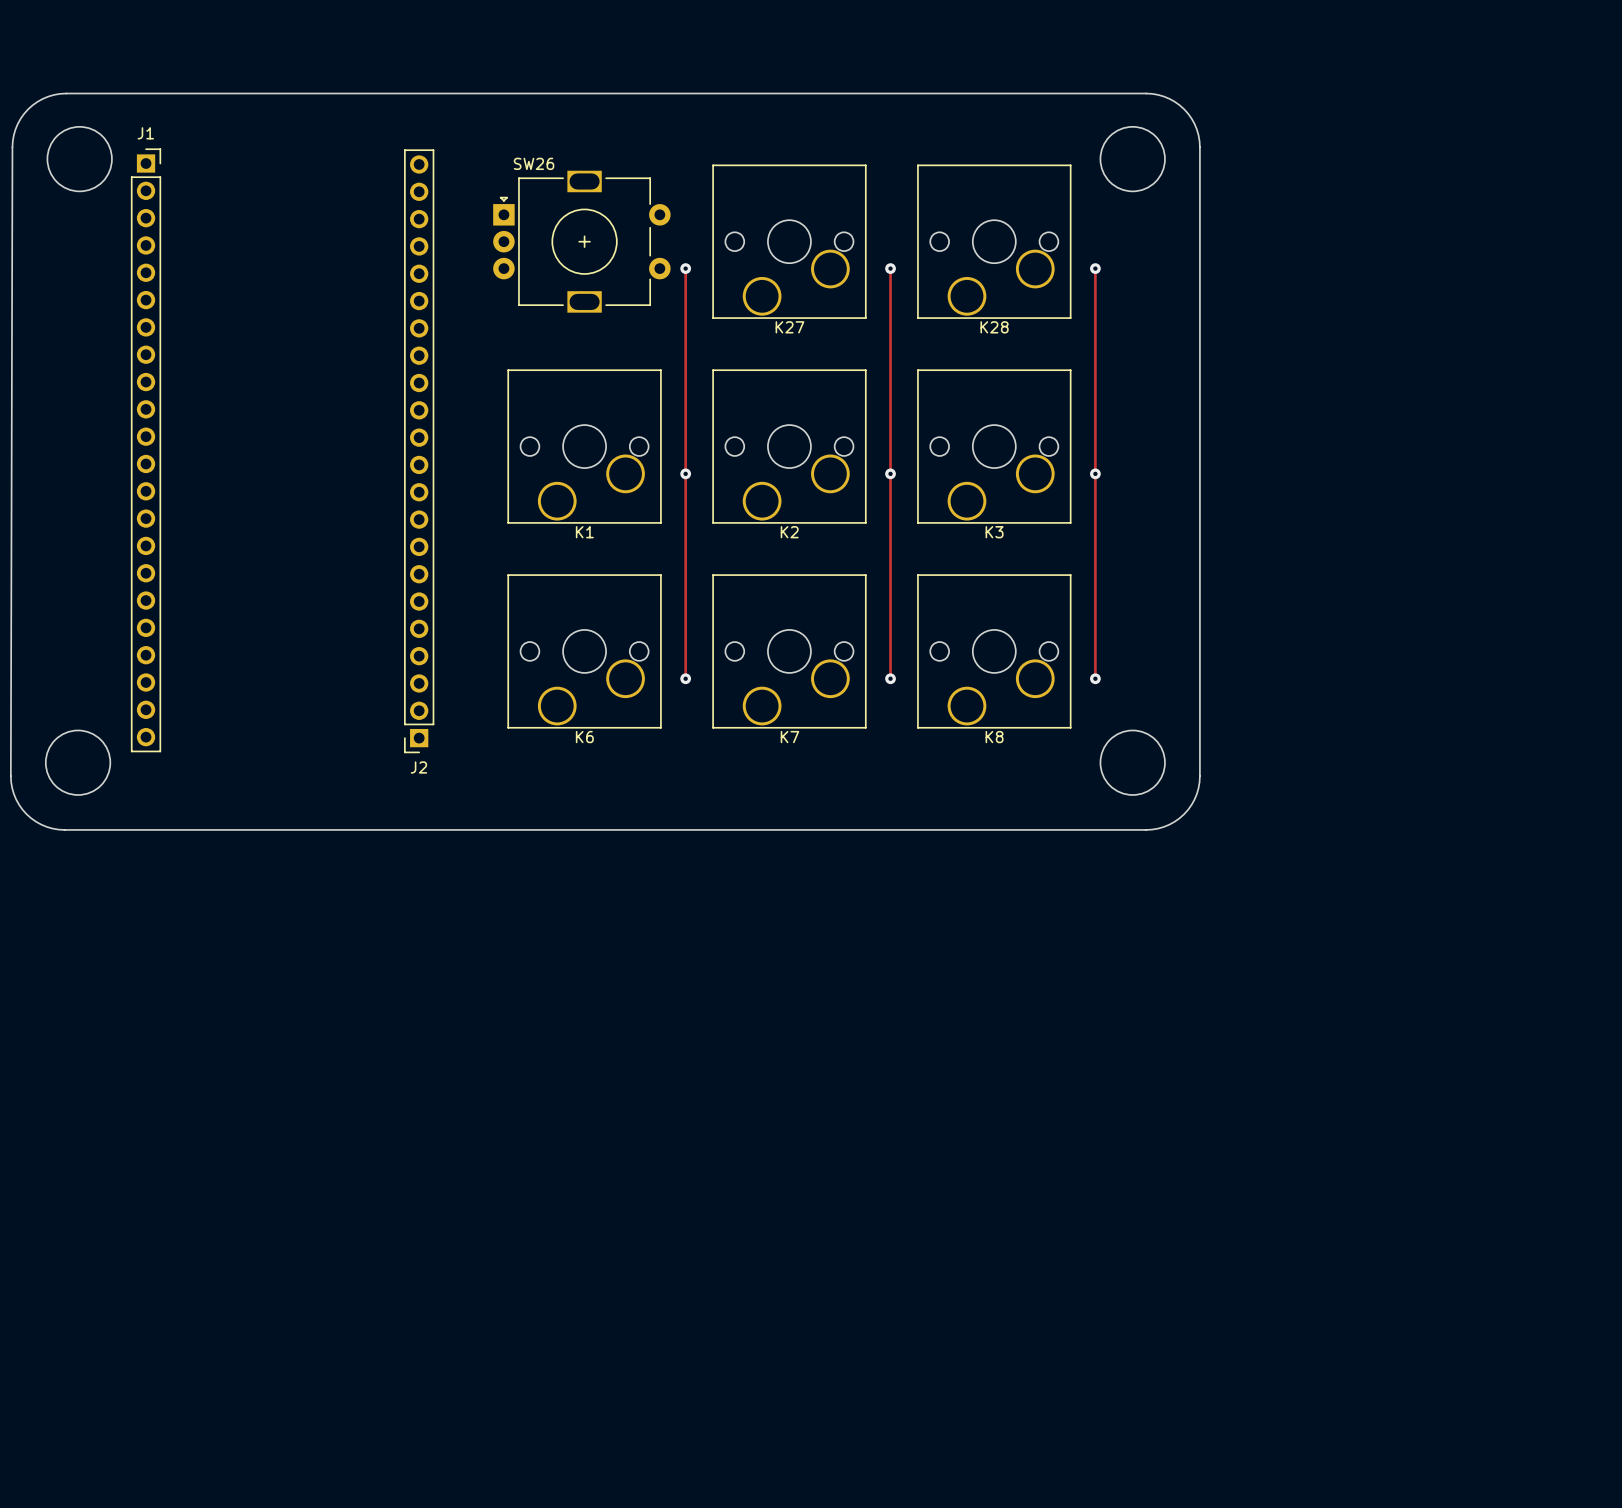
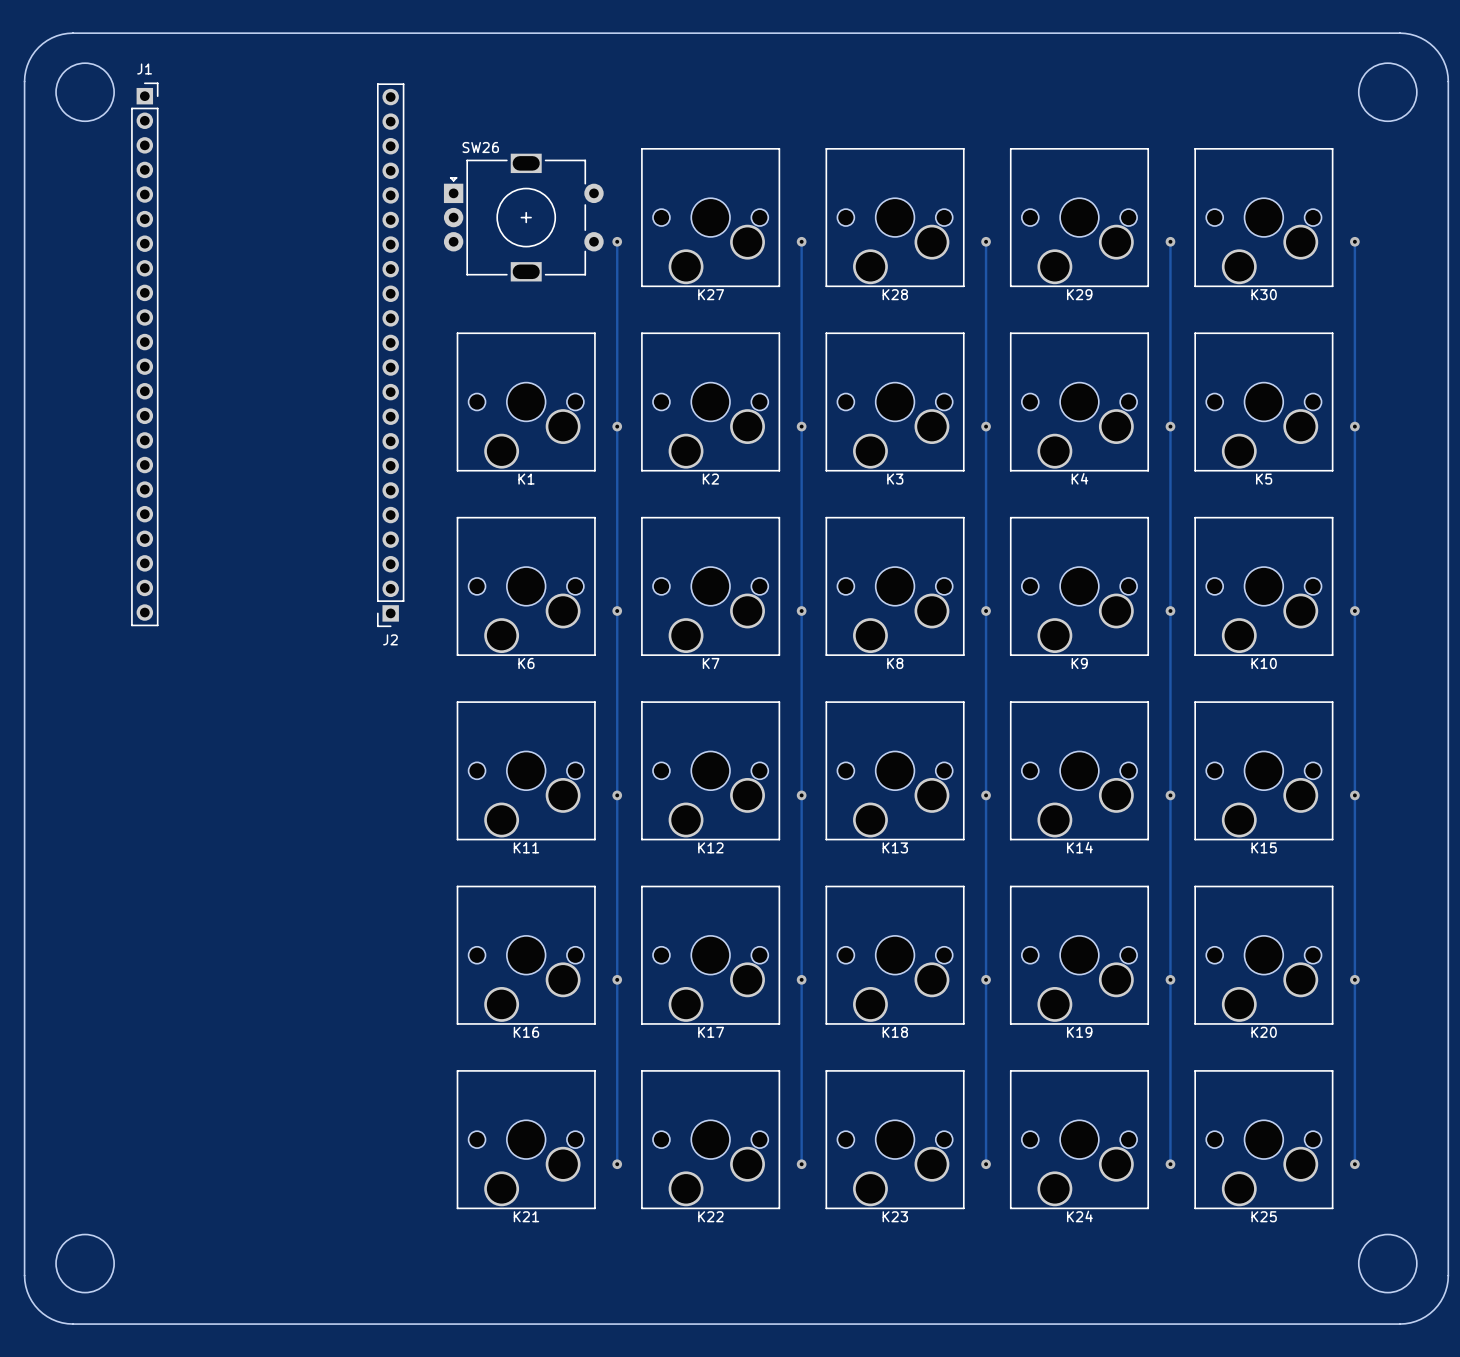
board edge: none -> (72, 33) (1399, 33) (1415, 35) (1434, 47) (1443, 60) (1448, 81) (1448, 1275) (1443, 1296) (1434, 1309) (1420, 1319) (1399, 1324) (72, 1324) (51, 1319) (38, 1309) (27, 1291) (24, 1275) (24, 81) (27, 65) (38, 47) (51, 37) (72, 33)
round board edge: none -> [1358, 62, 1418, 122]
board edge: (66, 93) (1146, 93) (1163, 96) (1174, 101) (1191, 118) (1196, 129) (1199, 147) (1199, 776) (1196, 793) (1191, 804) (1174, 821) (1163, 826) (1146, 829) (64, 829) (46, 826) (36, 821) (19, 804) (13, 793) (10, 776) (12, 147) (15, 129) (28, 109) (48, 96) (66, 93) -> none
round board edge: [1100, 126, 1166, 192] -> none
round board edge position: (79, 159) -> (85, 92)
K29: none -> (1079, 217)
K30: none -> (1263, 217)
track: none -> (1170, 241) (1170, 1164)
via: none -> (1170, 241)
track: none -> (1354, 241) (1354, 1164)
via: none -> (1354, 241)
K4: none -> (1079, 401)
K5: none -> (1263, 401)
J1 position: (146, 450) -> (144, 354)
J2 position: (419, 451) -> (390, 355)
via: none -> (1170, 426)
via: none -> (1354, 426)
K9: none -> (1079, 586)
K10: none -> (1263, 586)
track: none -> (617, 610) (617, 1164)
track: none -> (801, 610) (801, 1164)
track: none -> (986, 610) (986, 1164)
via: none -> (1170, 610)
via: none -> (1354, 610)
round board edge: [45, 730, 111, 796] -> none
round board edge: [1100, 730, 1166, 796] -> none
K11: none -> (526, 770)
K12: none -> (710, 770)
K13: none -> (895, 770)
K14: none -> (1079, 770)
K15: none -> (1263, 770)
via: none -> (617, 795)
via: none -> (801, 795)
via: none -> (986, 795)
via: none -> (1170, 795)
via: none -> (1354, 795)
K16: none -> (526, 955)
K17: none -> (710, 955)
K18: none -> (895, 955)
K19: none -> (1079, 955)
K20: none -> (1263, 955)
via: none -> (617, 979)
via: none -> (801, 979)
via: none -> (986, 979)
via: none -> (1170, 979)
via: none -> (1354, 979)
K21: none -> (526, 1139)
K22: none -> (710, 1139)
K23: none -> (895, 1139)
K24: none -> (1079, 1139)
K25: none -> (1263, 1139)
via: none -> (617, 1164)
via: none -> (801, 1164)
via: none -> (986, 1164)
via: none -> (1170, 1164)
via: none -> (1354, 1164)
round board edge: none -> [55, 1234, 115, 1293]
round board edge: none -> [1358, 1234, 1418, 1293]

